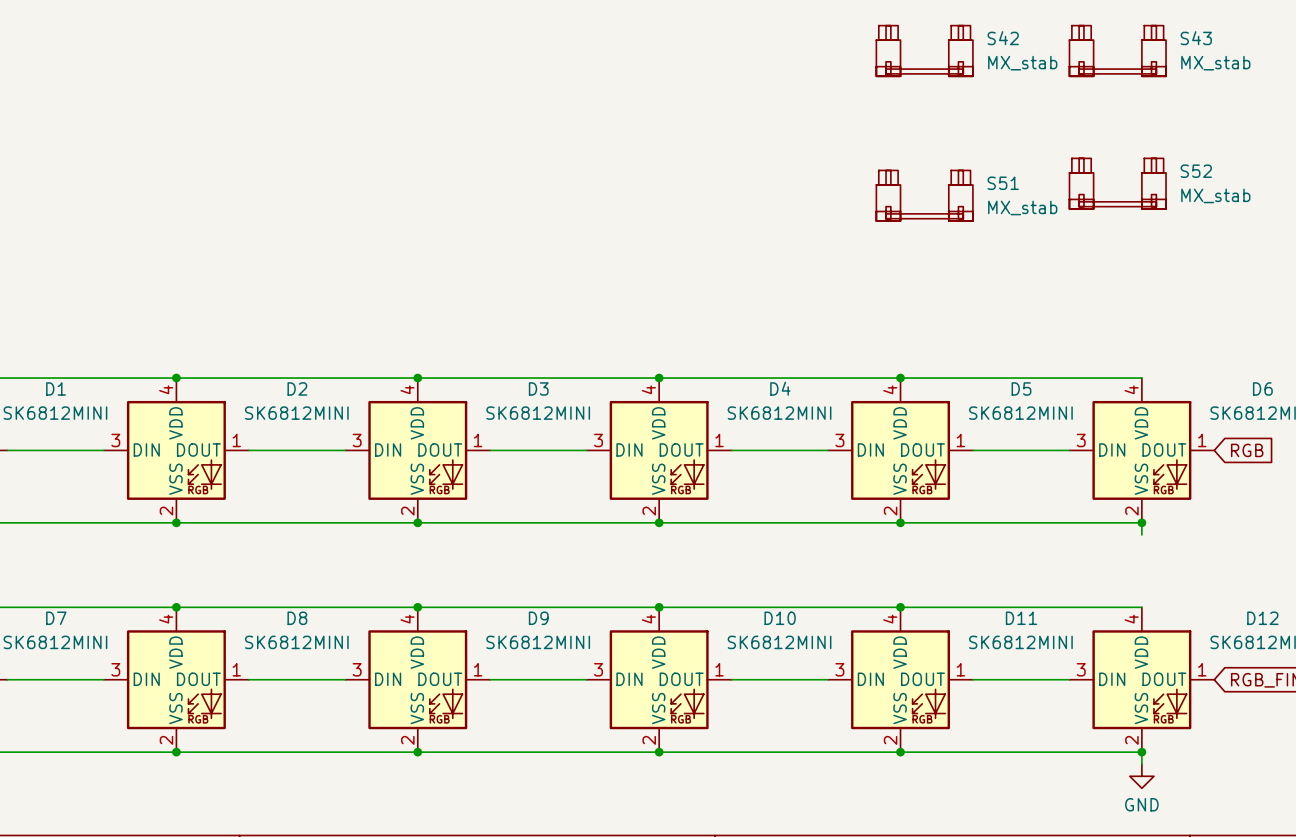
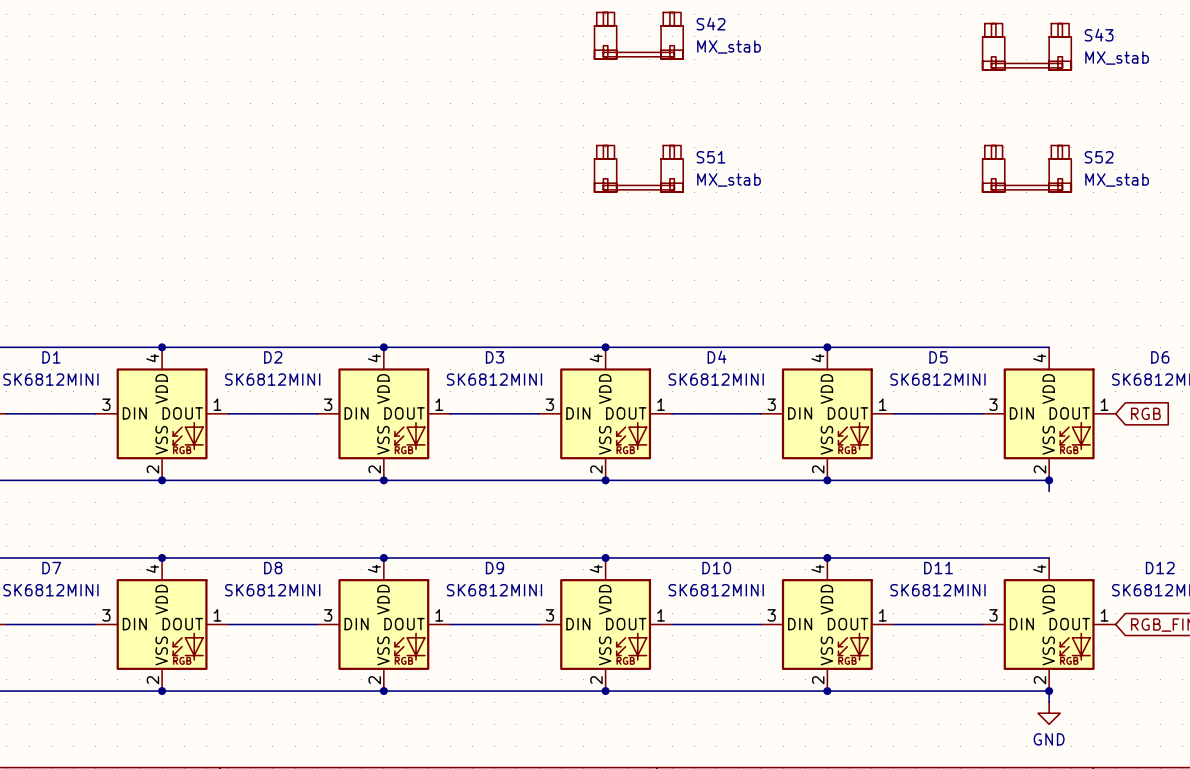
S42 position: (924, 50) -> (638, 35)
S51 position: (924, 195) -> (638, 168)

